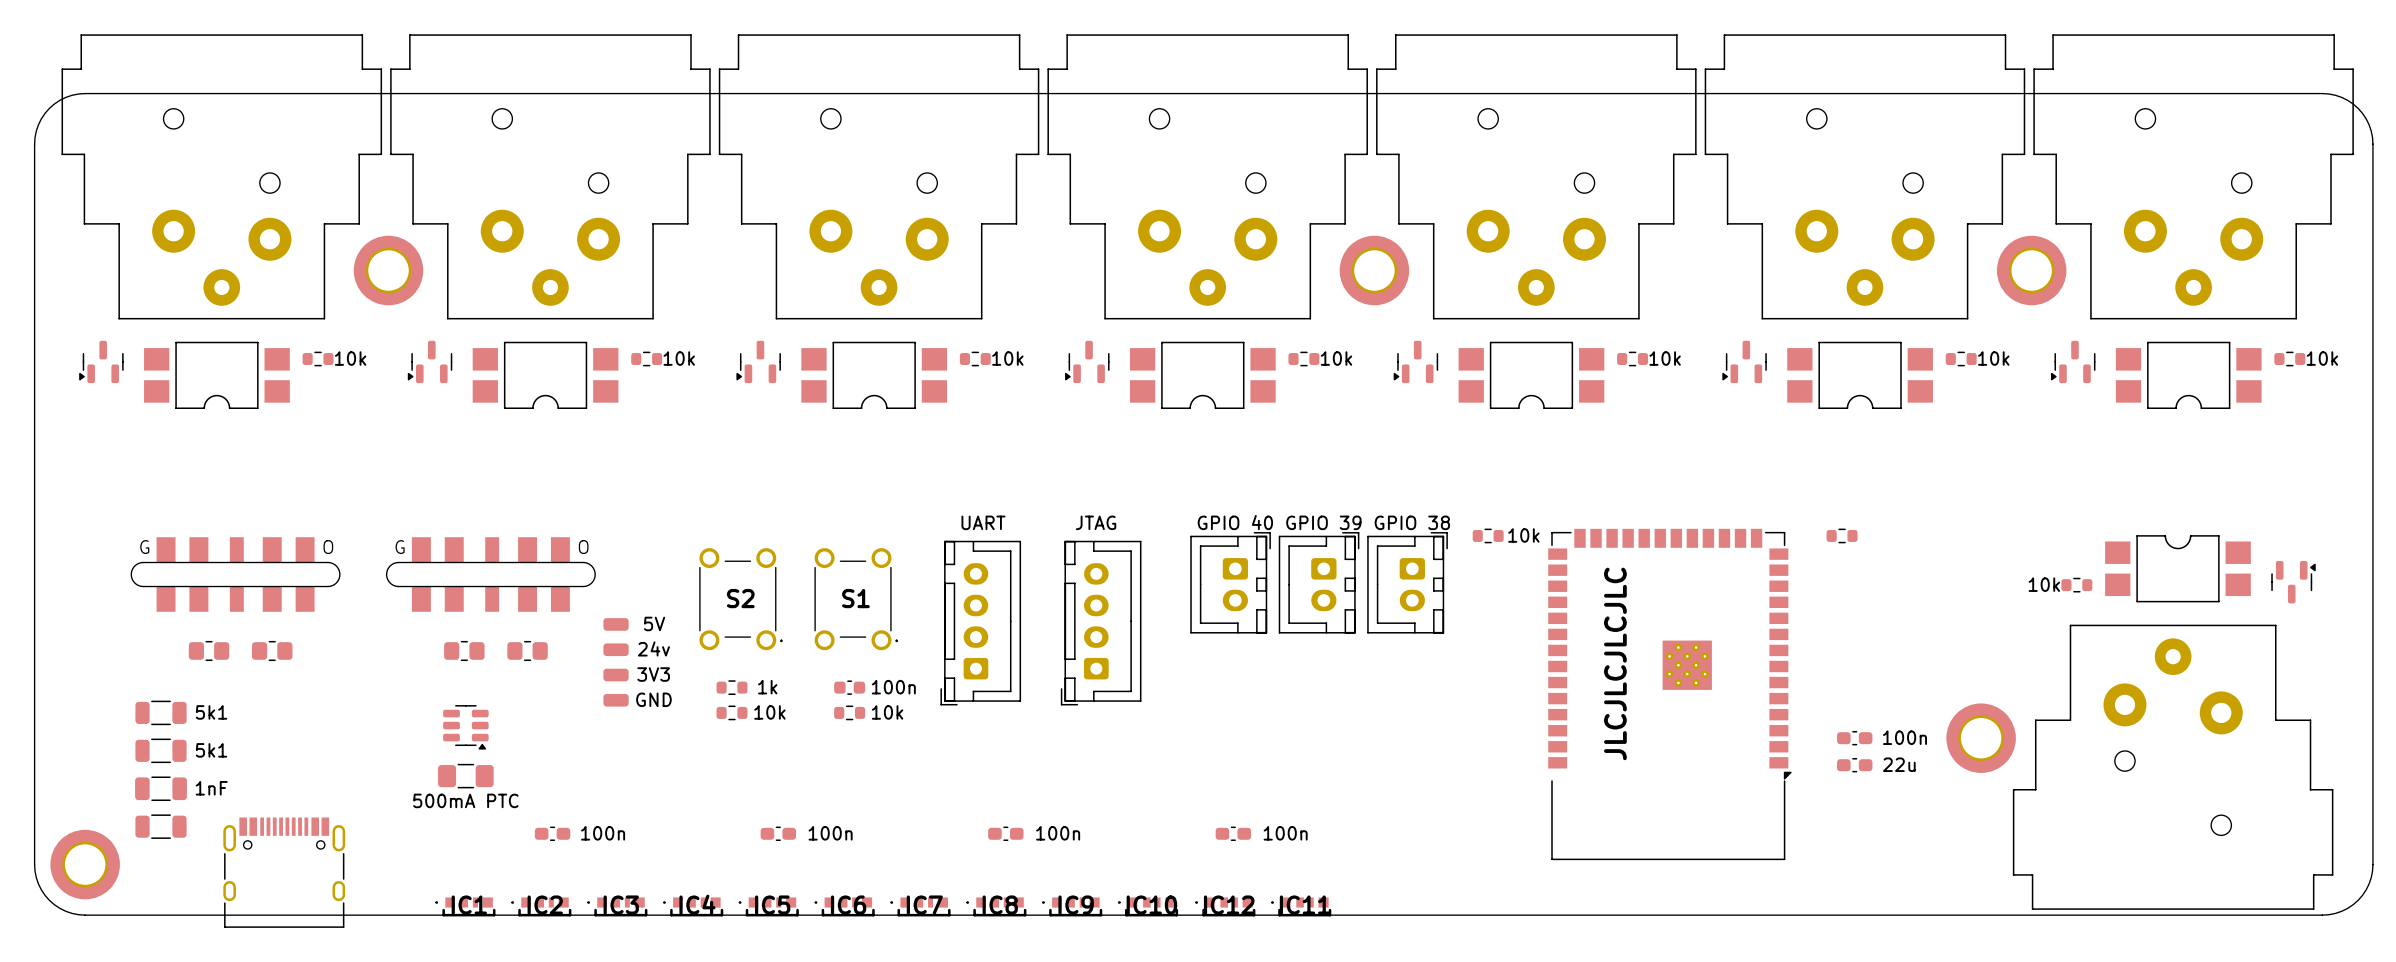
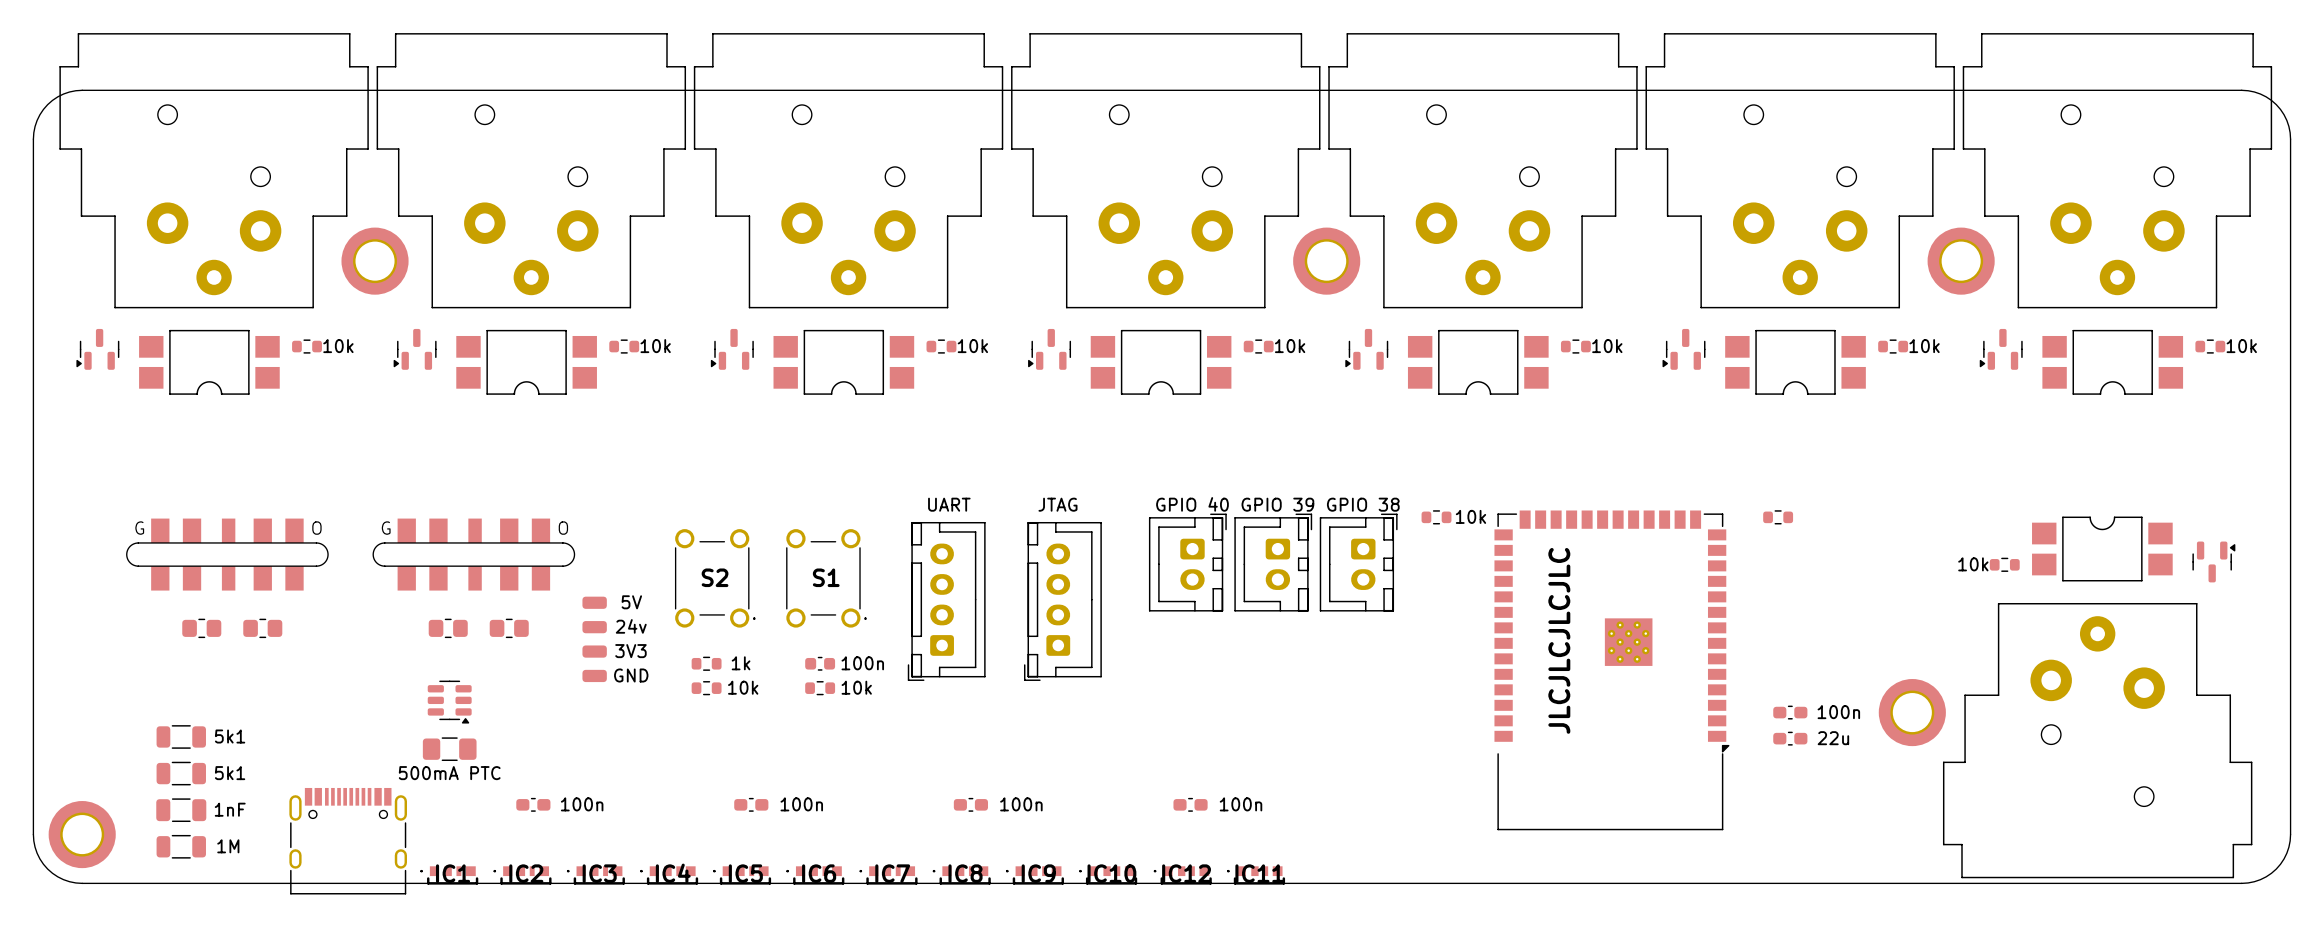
part: 5k1 (161, 712) -> none
part: 5k1 (161, 750) -> none
part: none -> 5k1 (181, 736)
part position: (161, 788) -> (181, 810)
part: none -> 5k1 (181, 773)
part: (161, 826) -> none
part position: (284, 872) -> (348, 841)
part: none -> 1M (181, 846)

